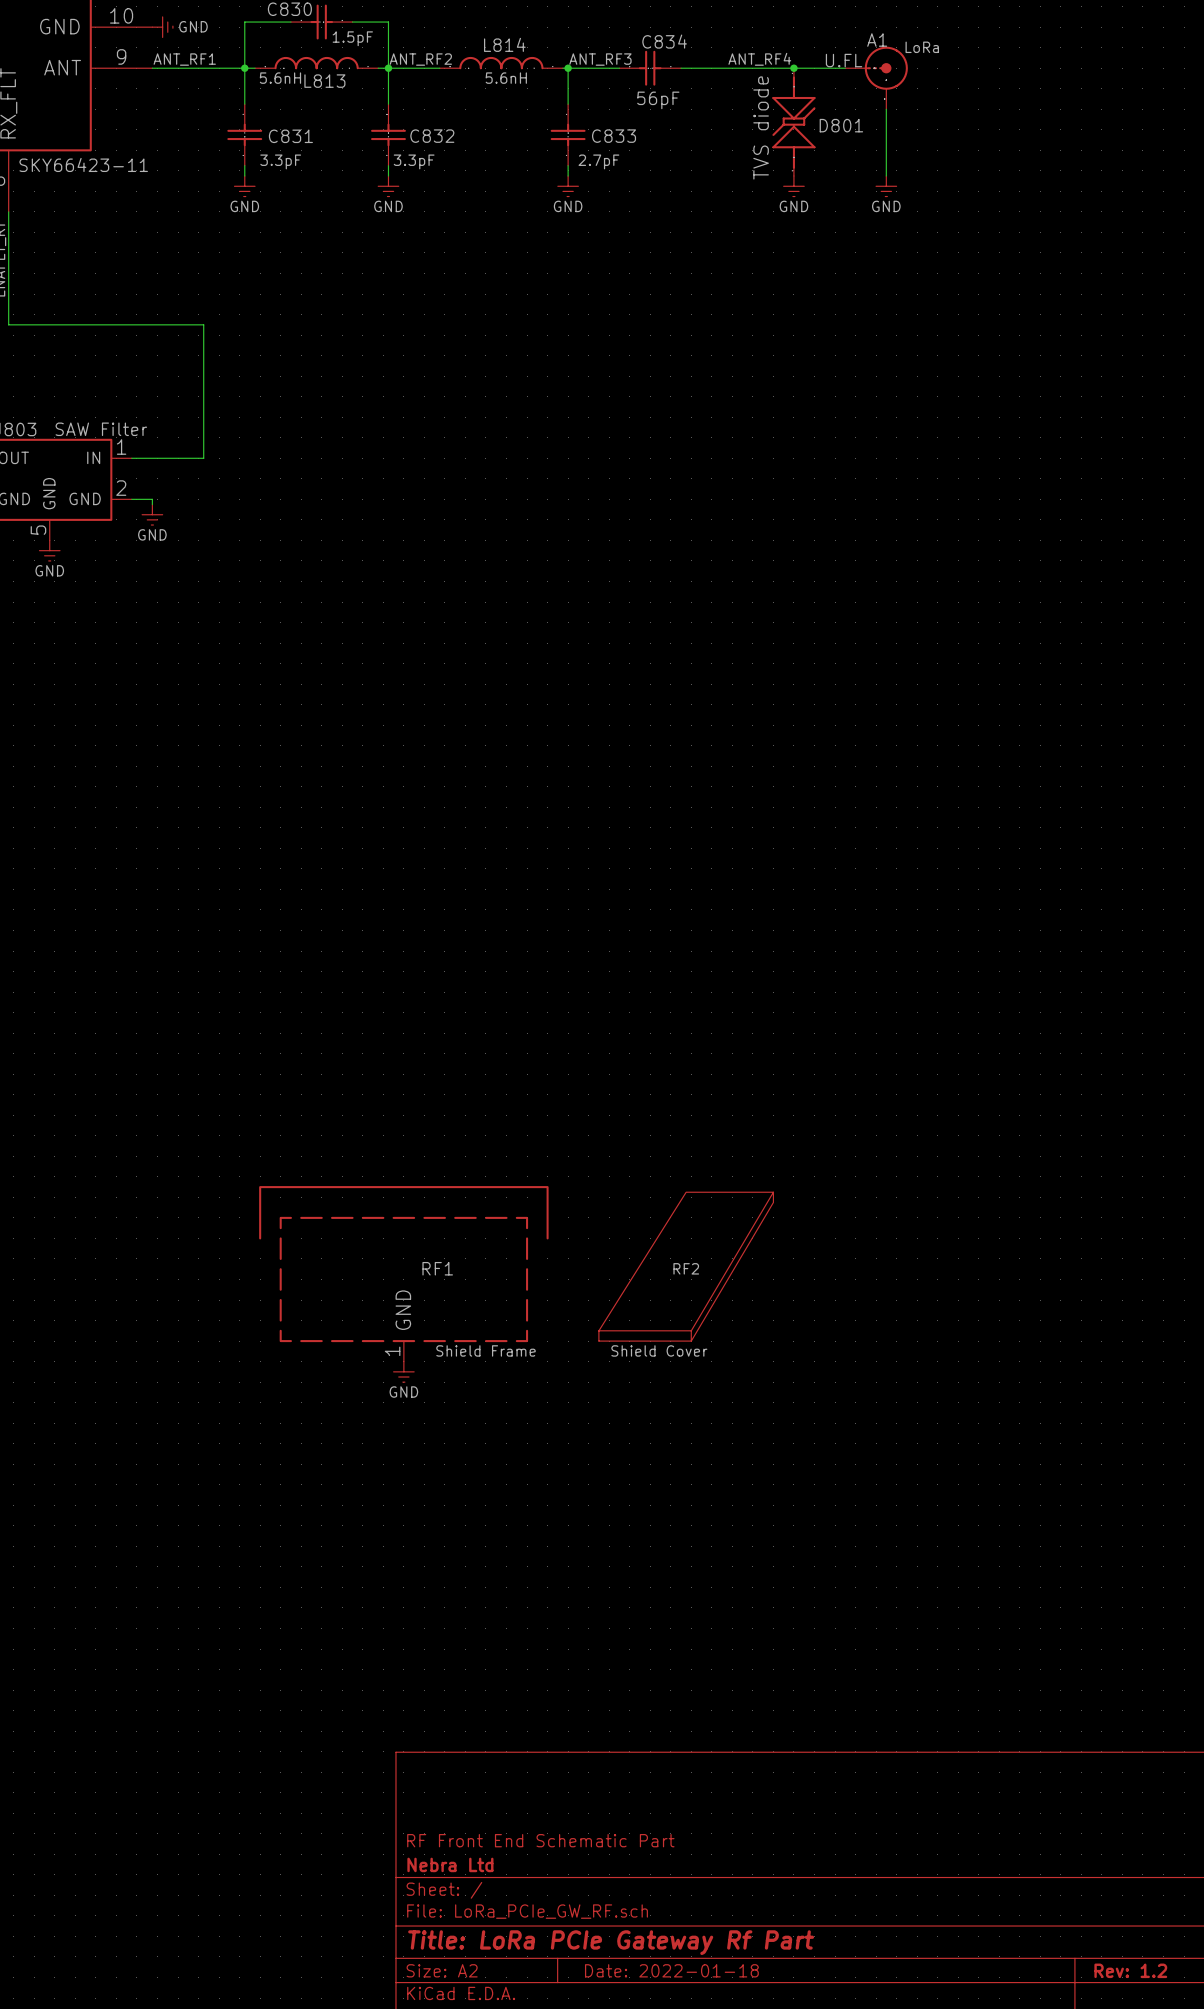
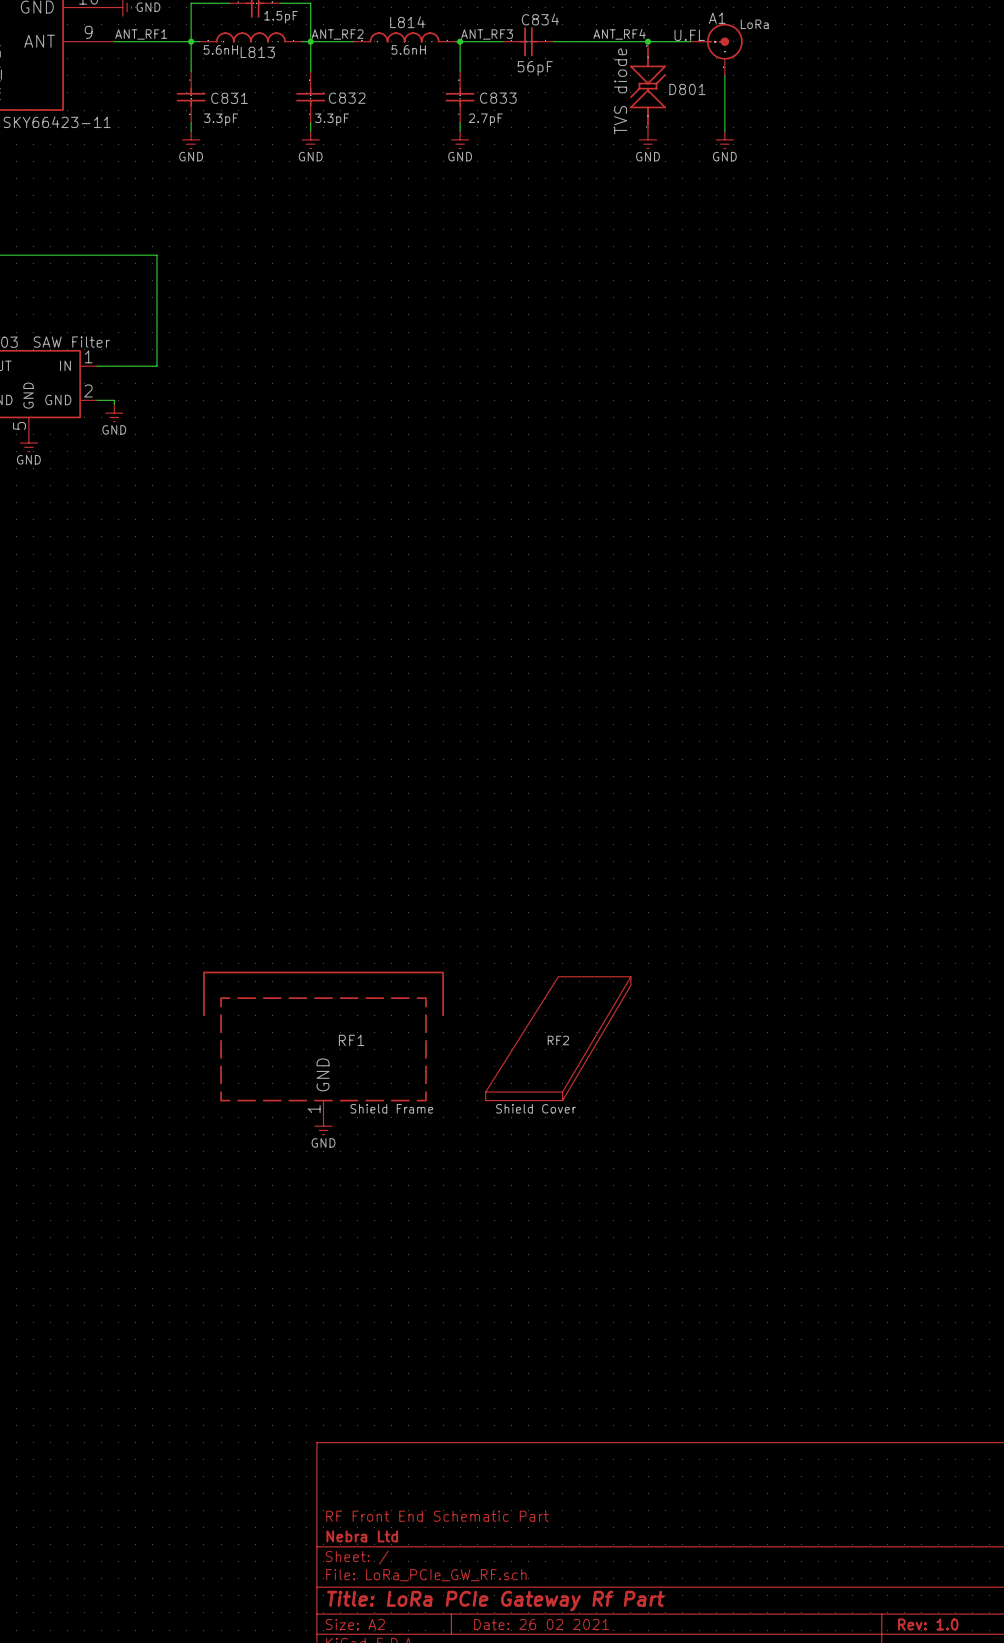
title block: Date: 2022-01-18 (671, 1970) -> Date: 26 02 2021 (541, 1624)
title block: Rev: 1.2 (1130, 1970) -> Rev: 1.0 (928, 1624)

